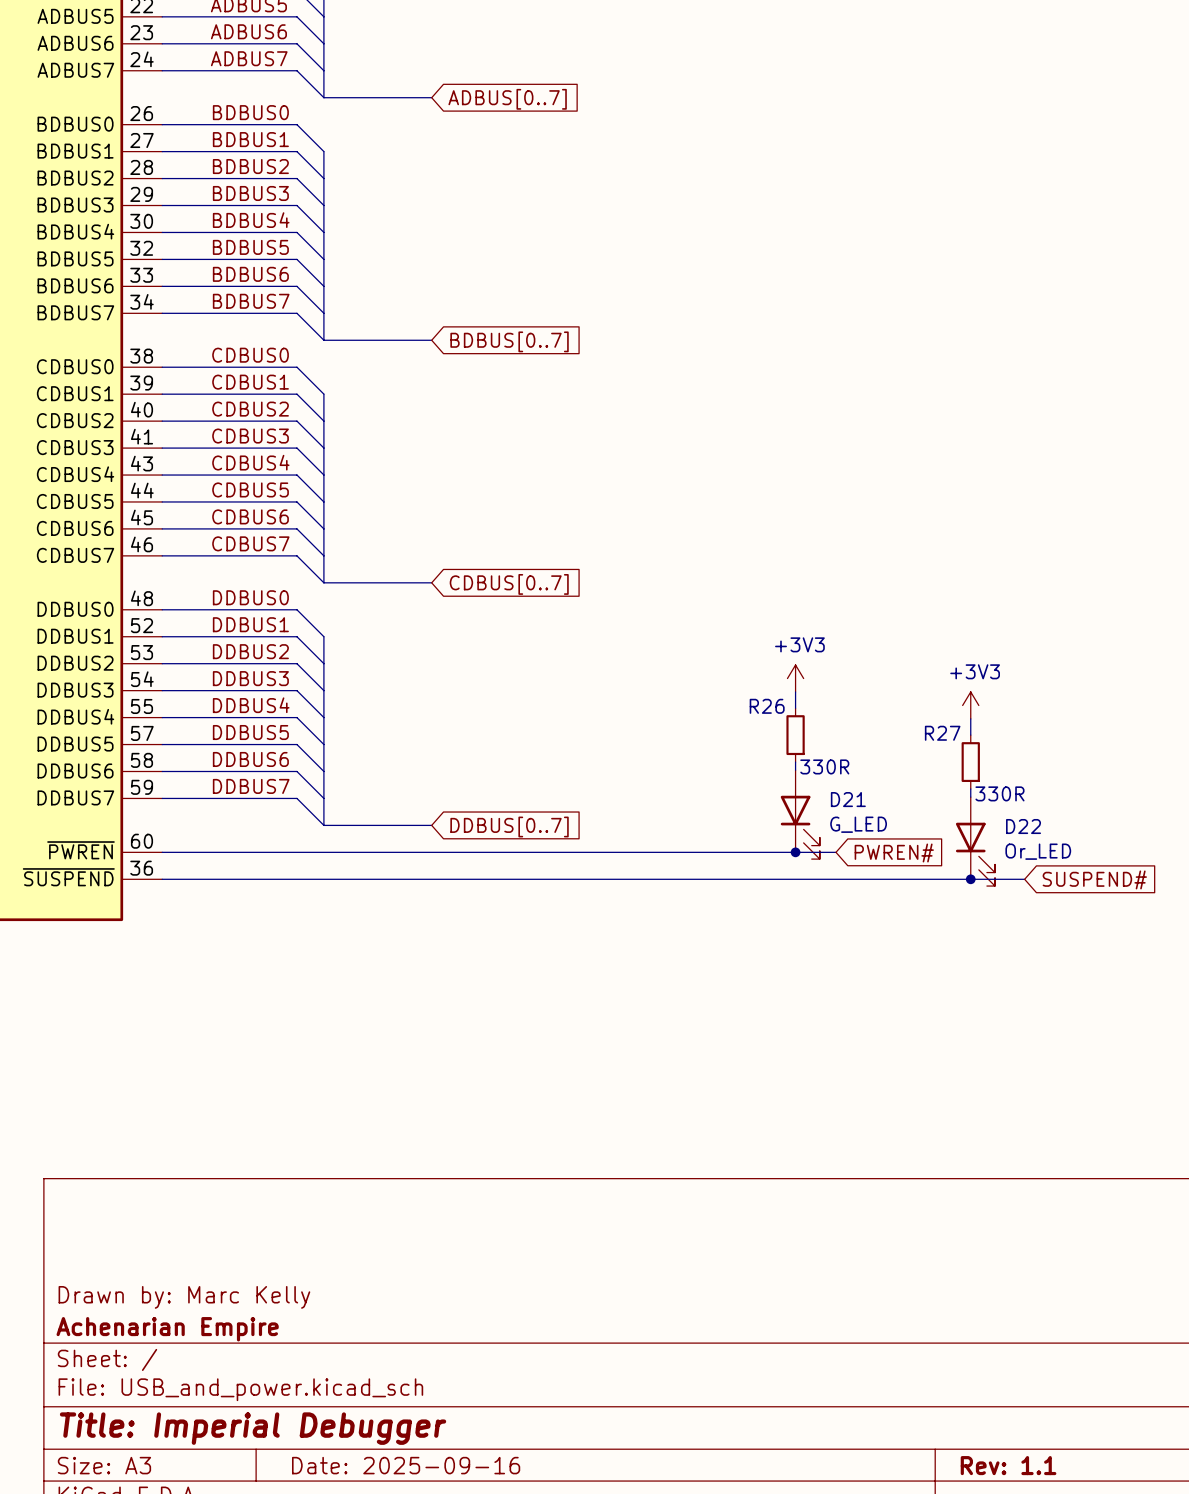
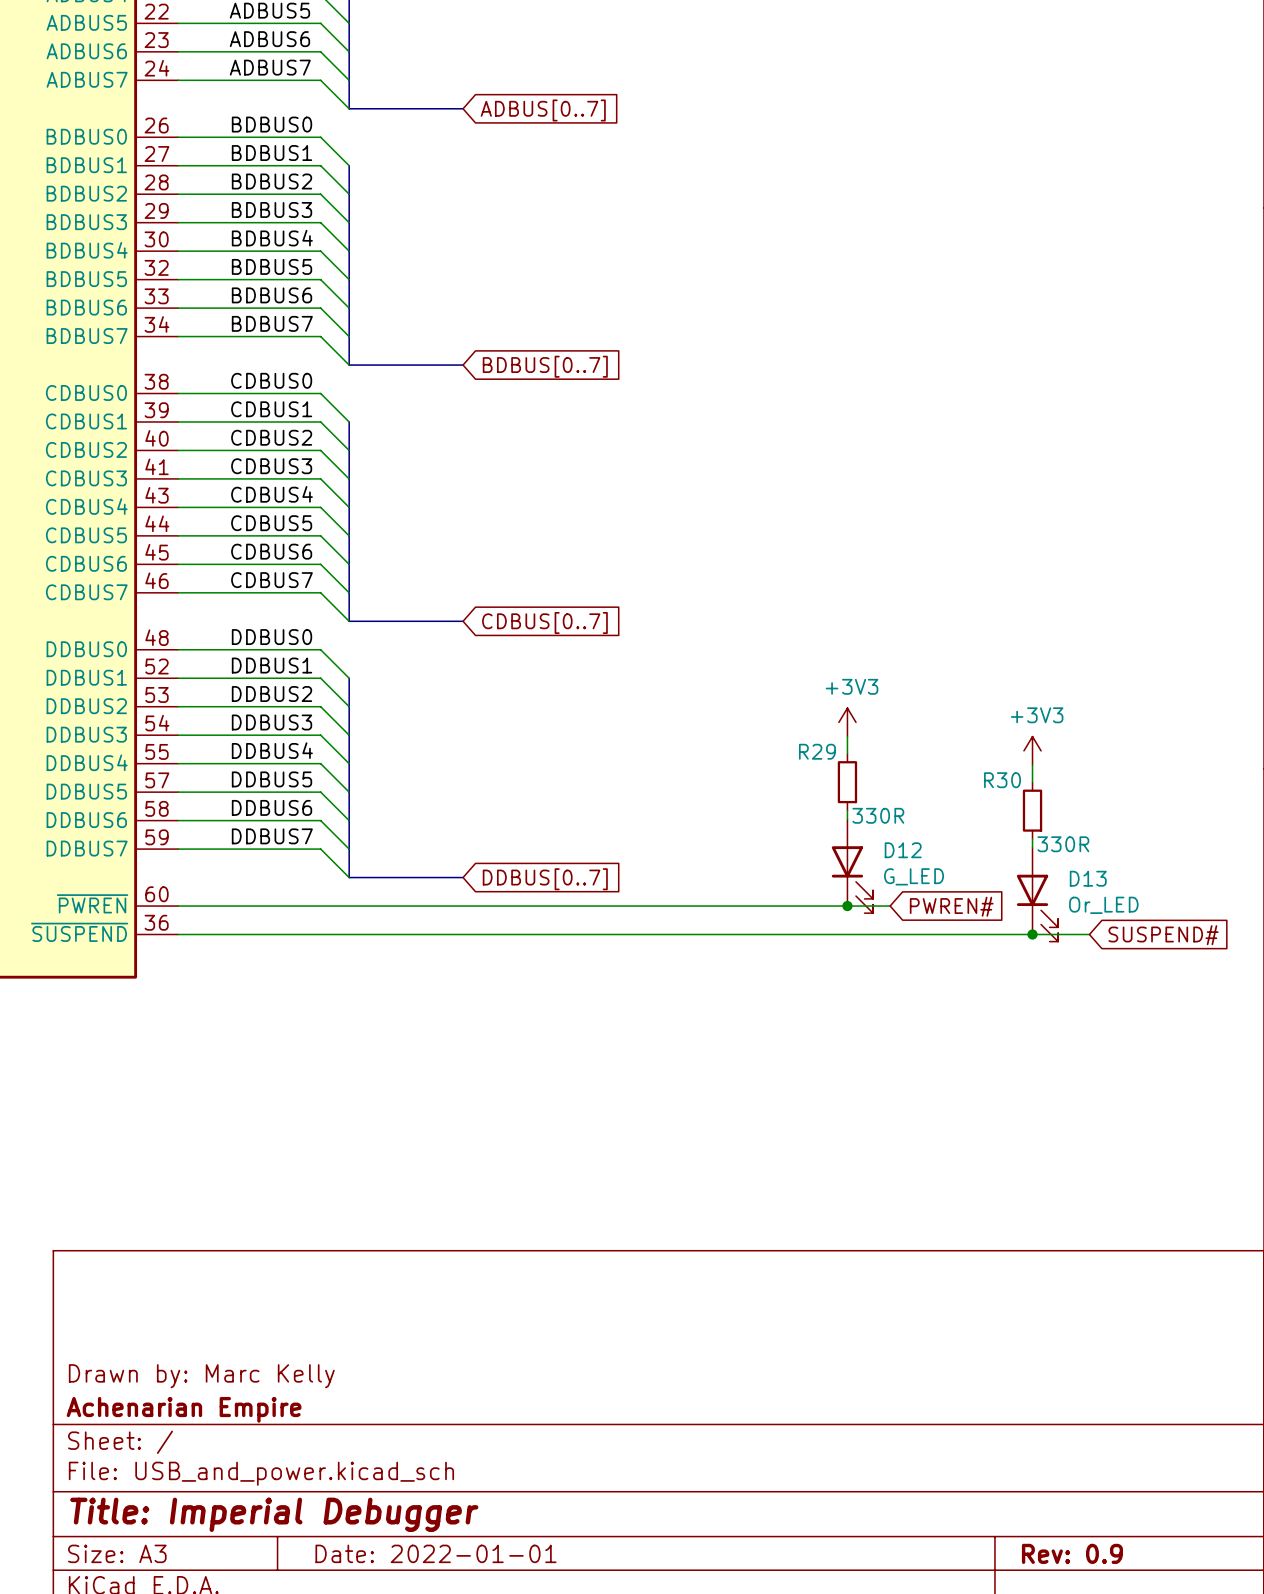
R26 name: R26 (767, 706) -> R29 (817, 751)
R27 name: R27 (942, 733) -> R30 (1002, 780)
D21 name: D21 (848, 799) -> D12 (903, 850)
D22 name: D22 (1023, 826) -> D13 (1088, 878)
title block: Date: 2025-09-16 (406, 1465) -> Date: 2022-01-01 (436, 1553)
title block: Rev: 1.1 (1008, 1465) -> Rev: 0.9 (1072, 1553)

